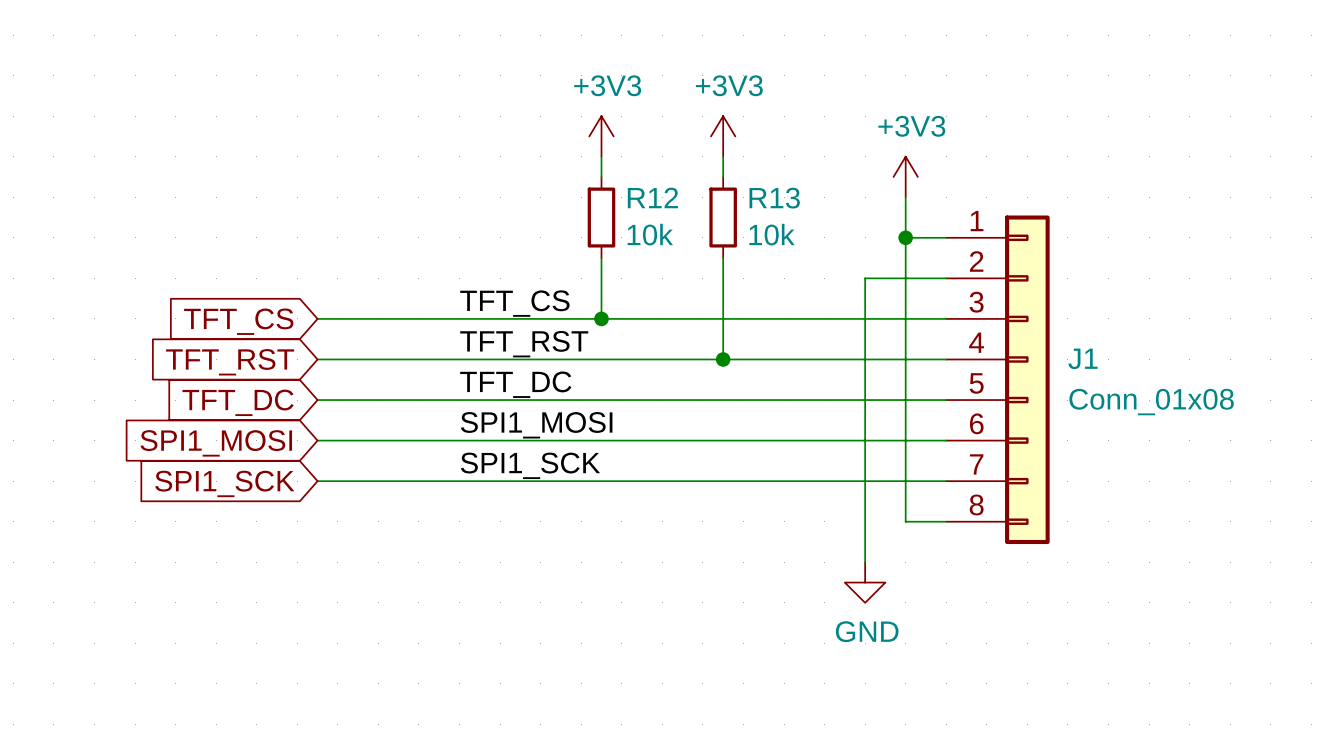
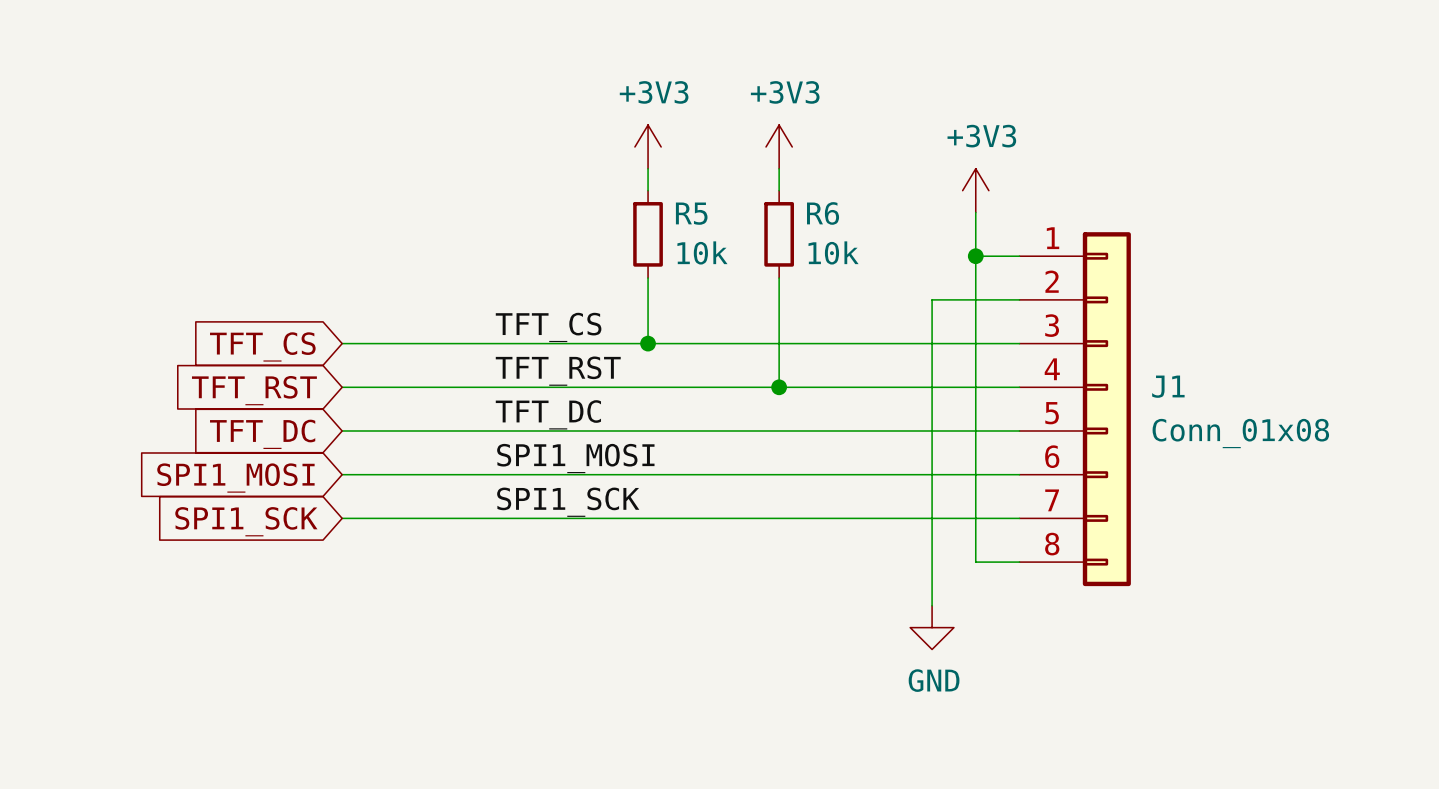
R12 name: R12 (652, 197) -> R5 (691, 213)
R13 name: R13 (774, 198) -> R6 (823, 213)

